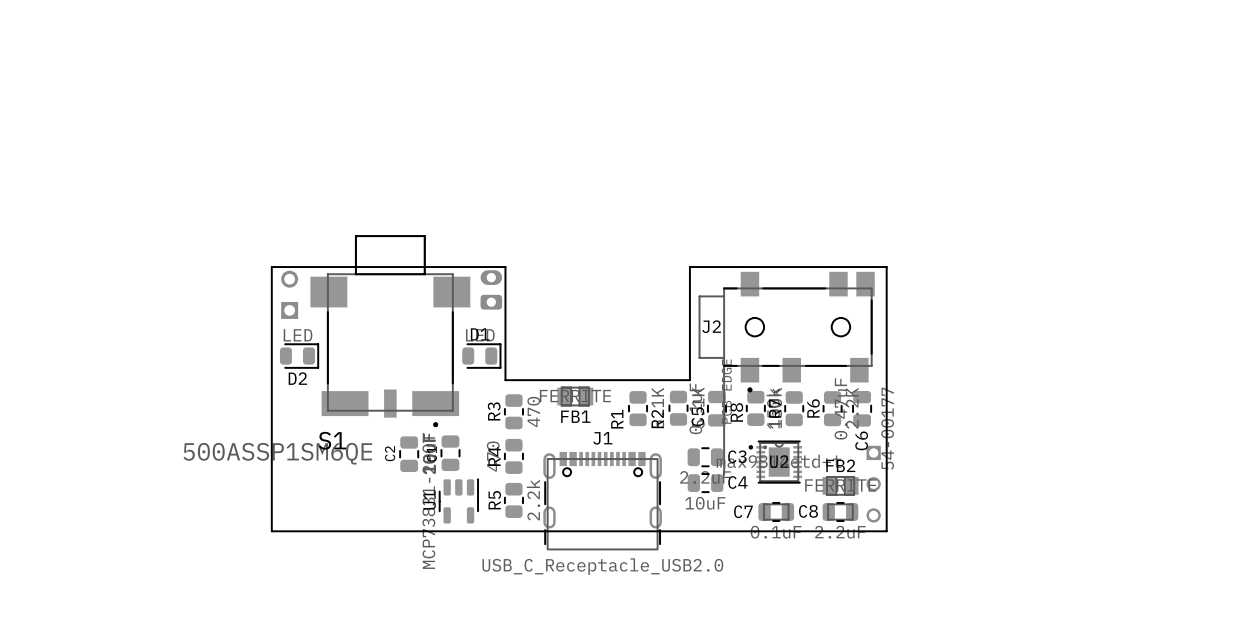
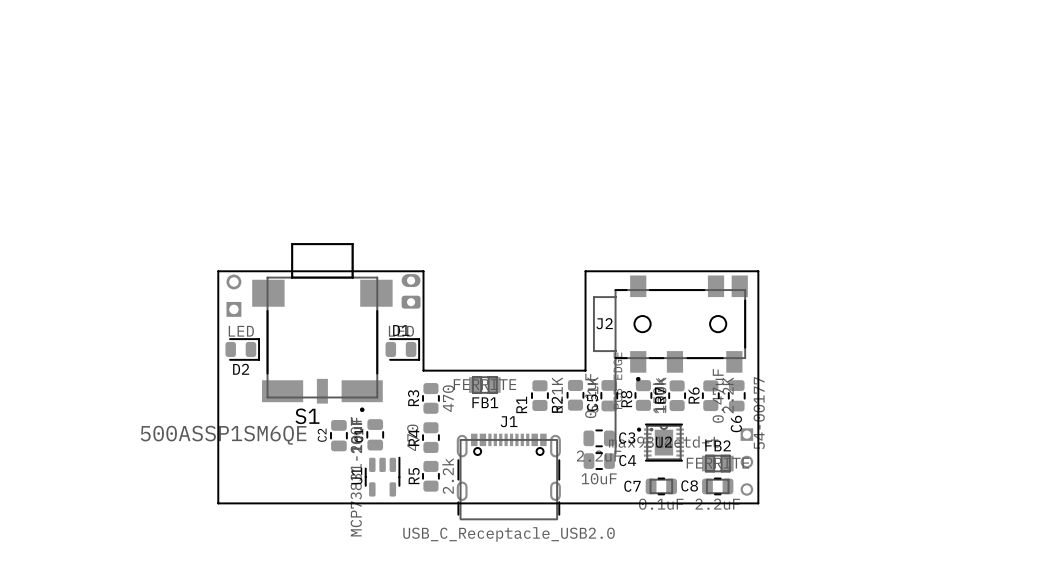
S1 name position: S1 (332, 440) -> S1 (307, 416)

